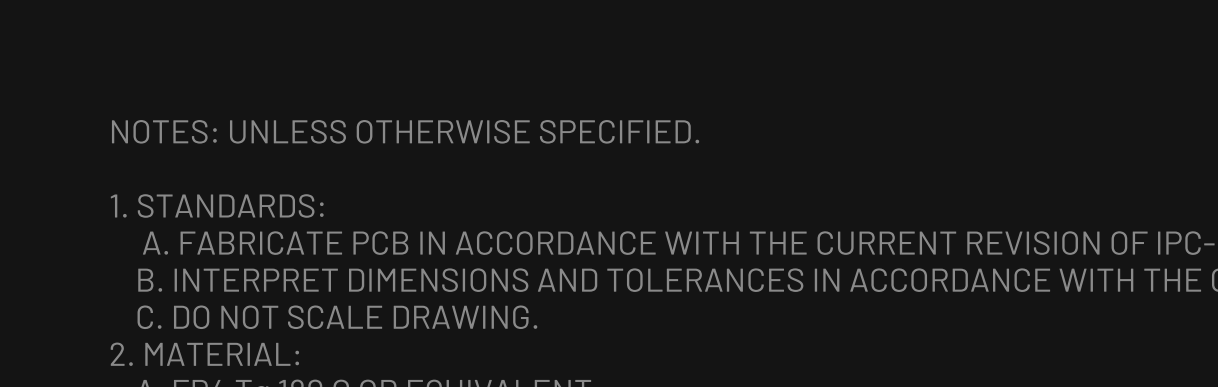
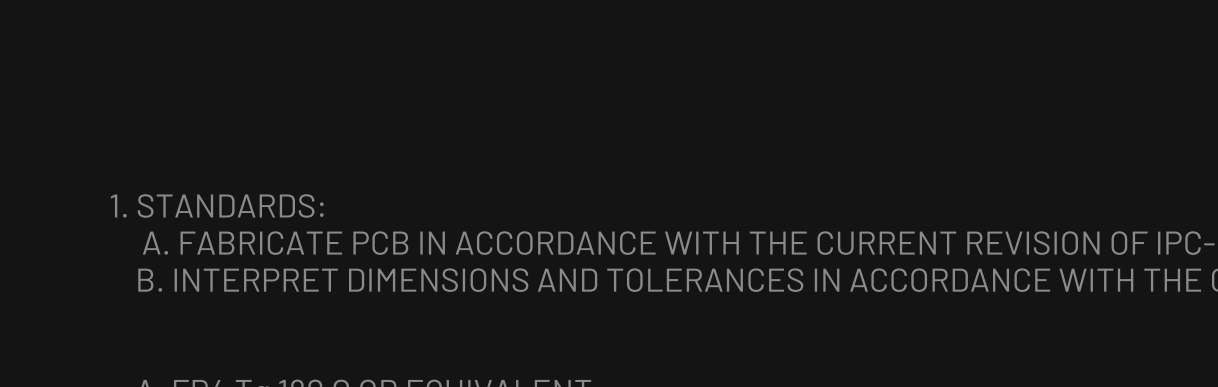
text: NOTES: UNLESS OTHERWISE SPECIFIED. (405, 131) -> none
text: C. DO NOT SCALE DRAWING. (337, 317) -> none
text: 2. MATERIAL: (204, 354) -> none

